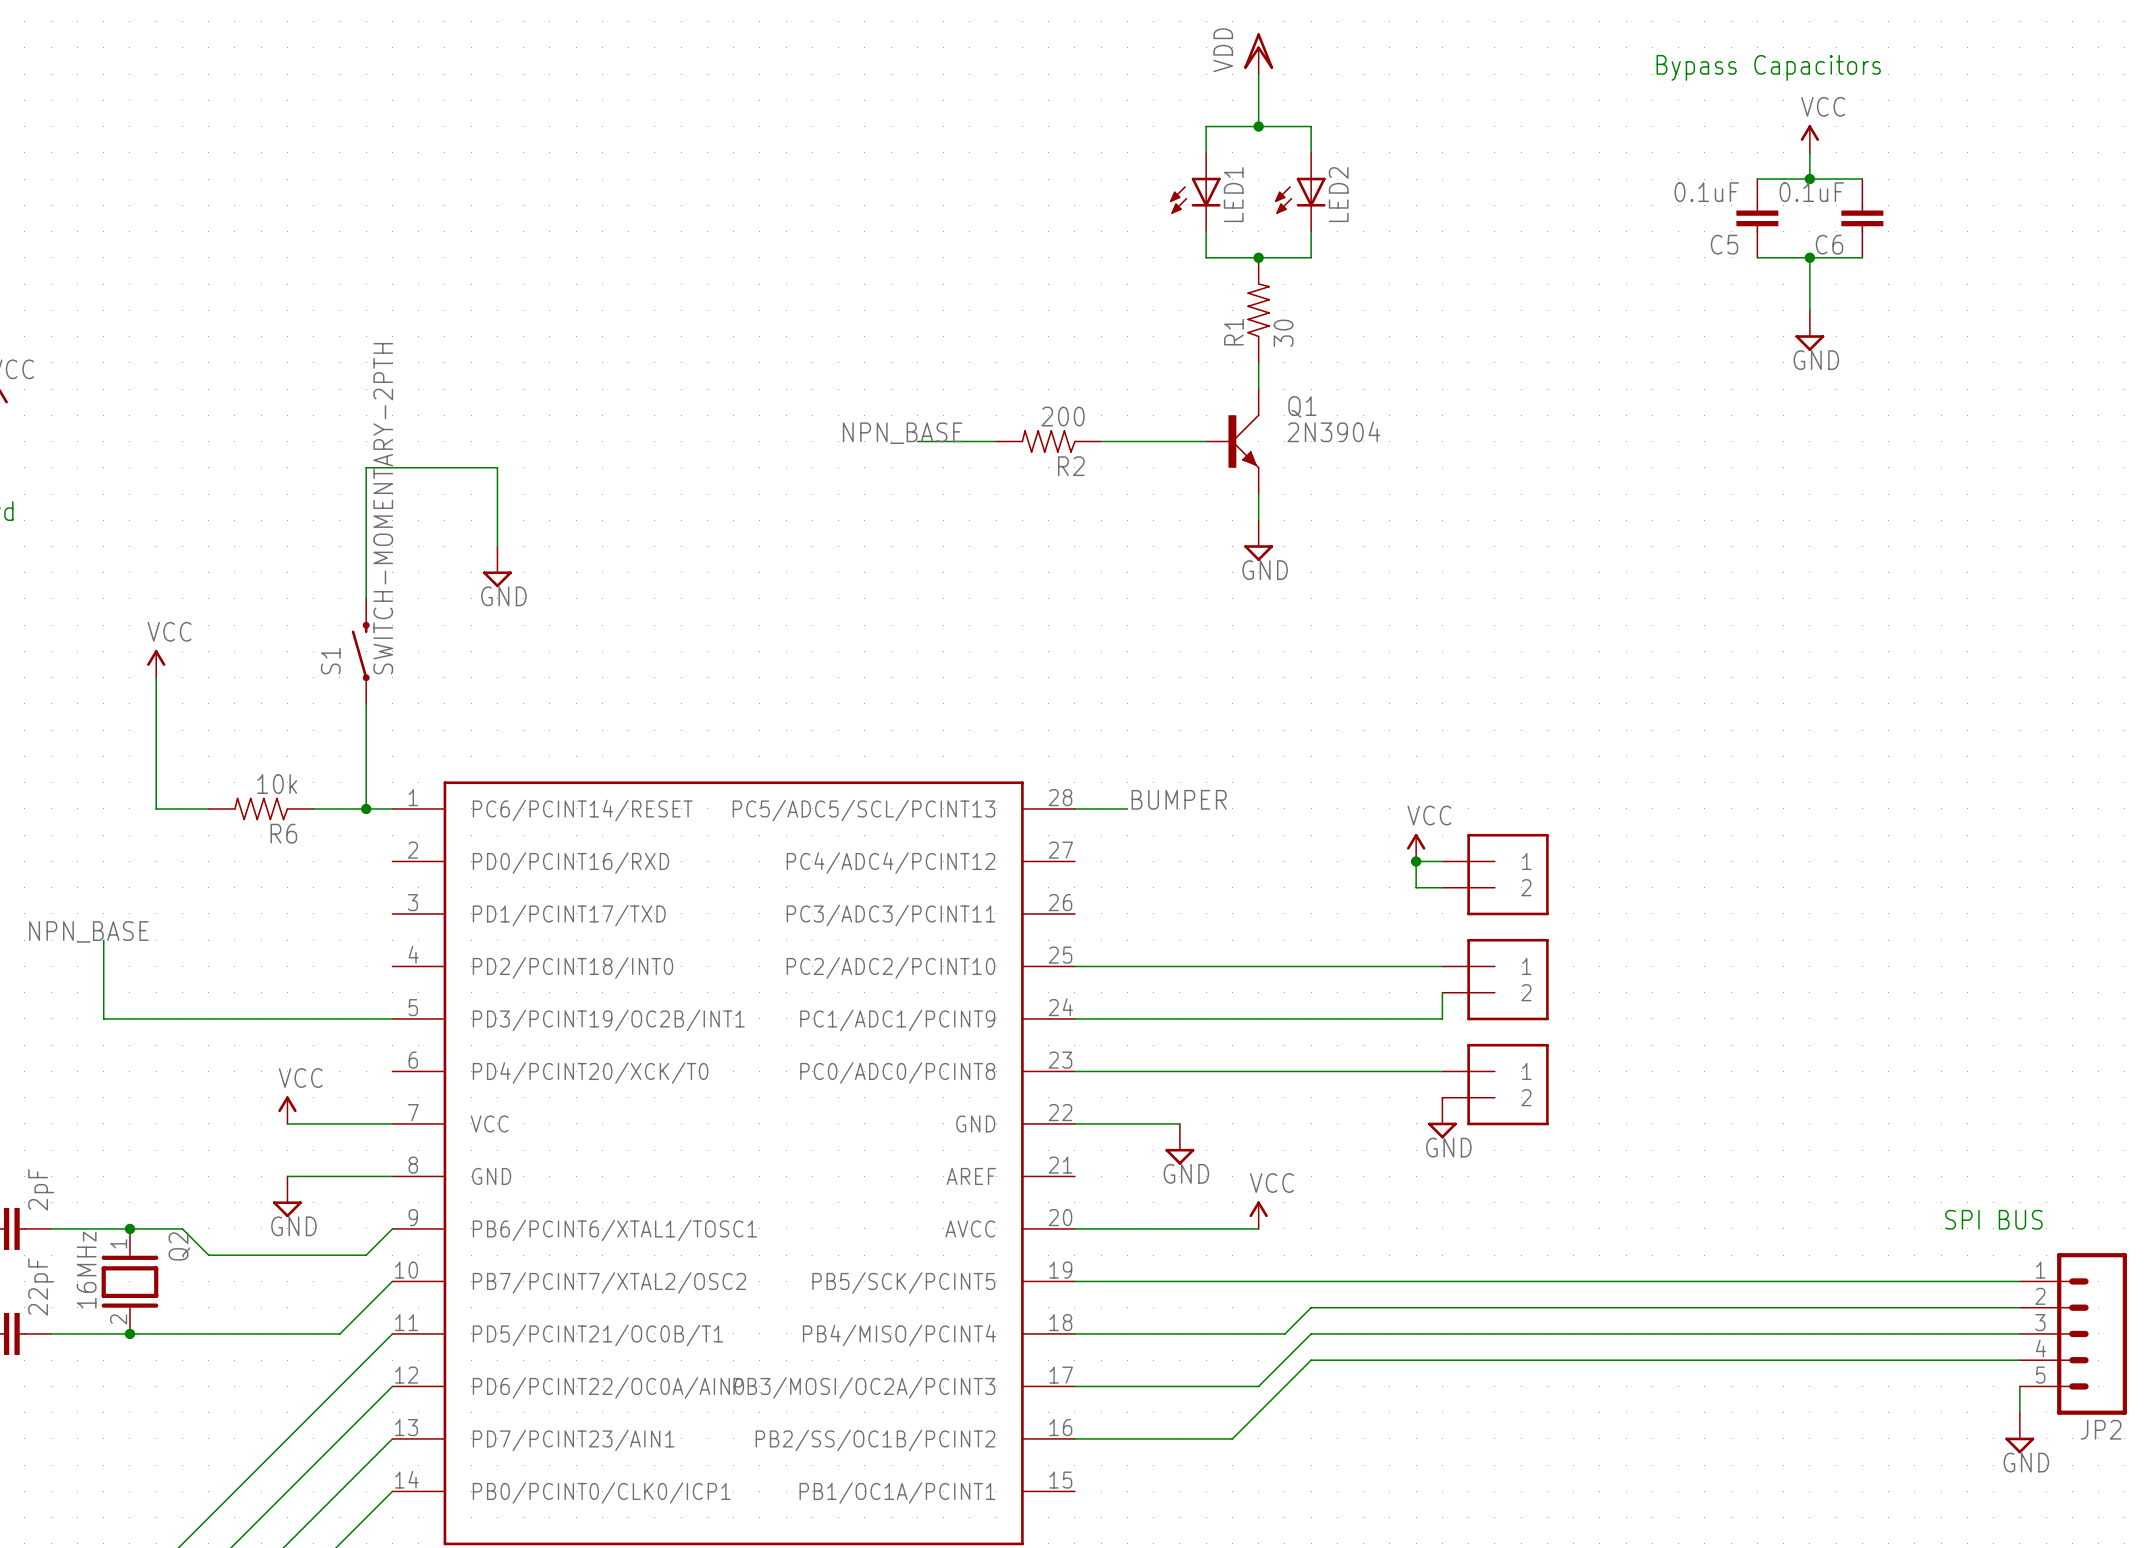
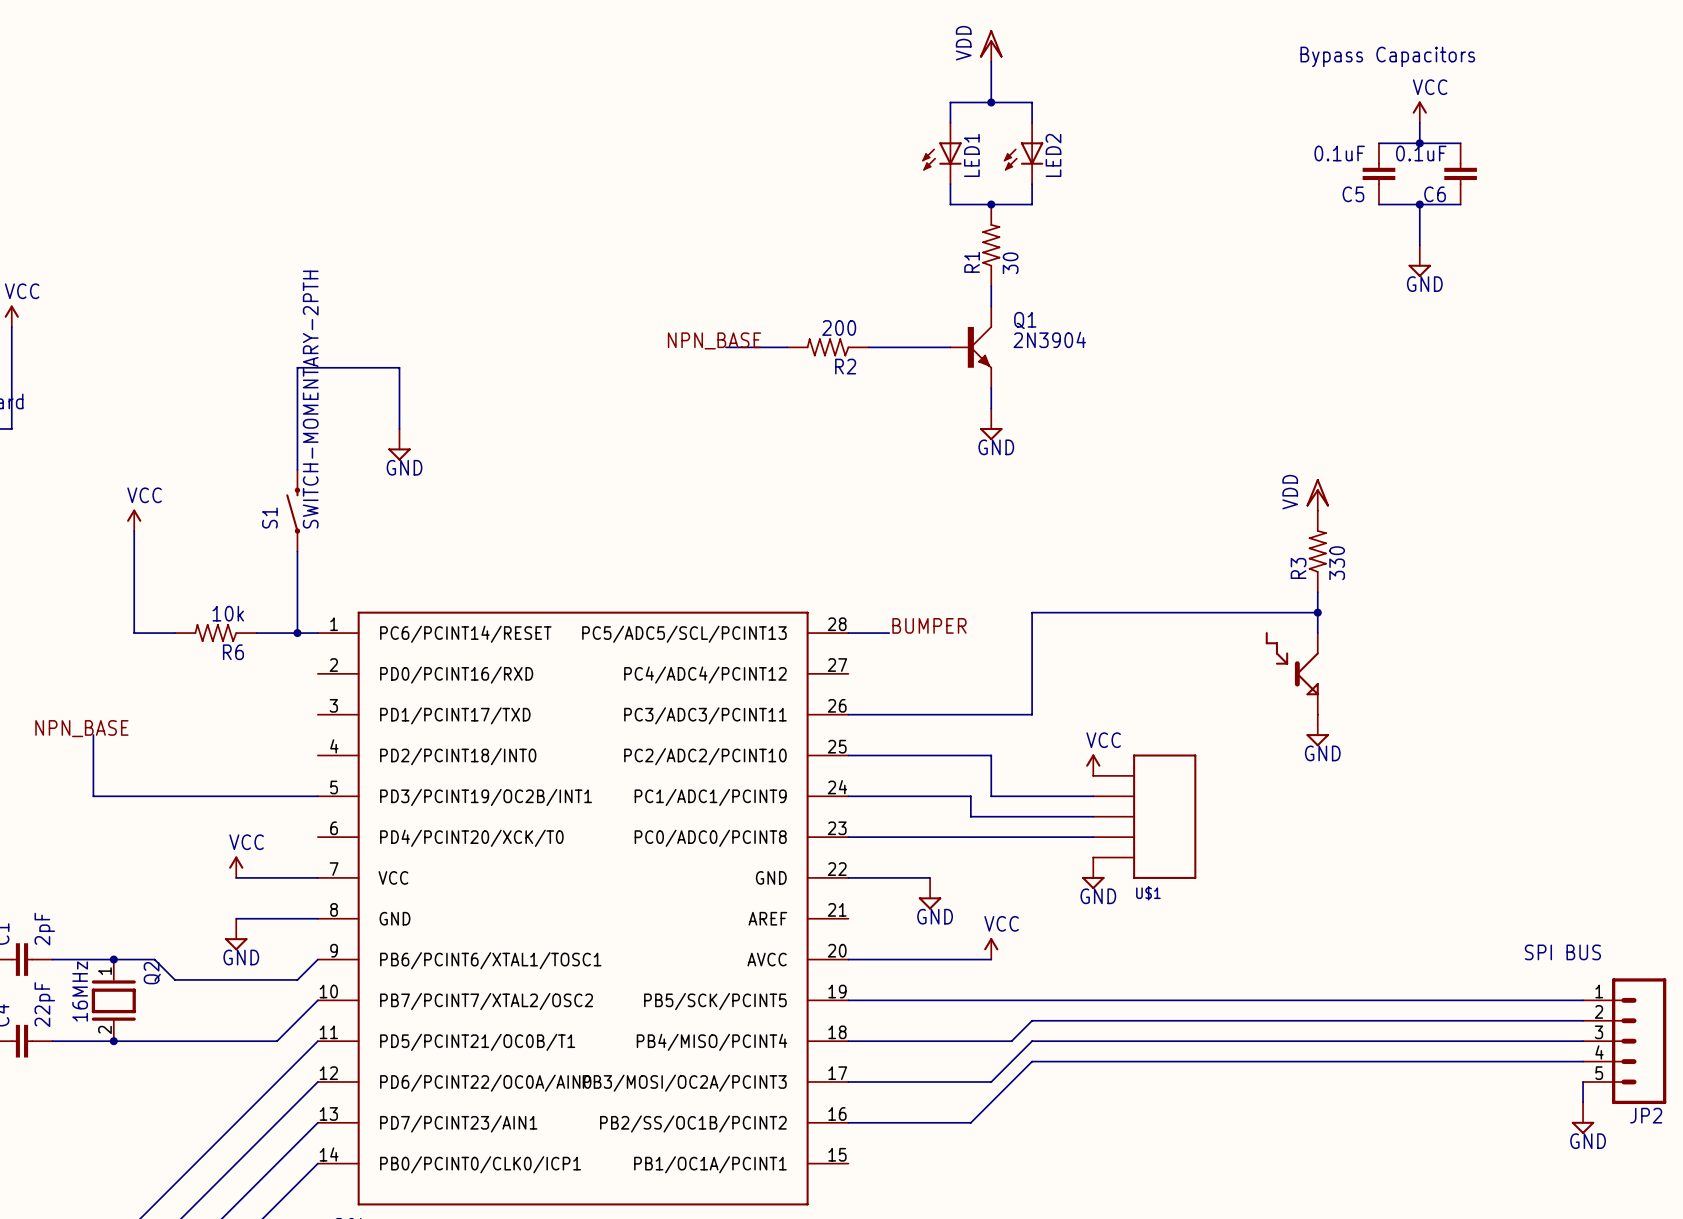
power symbol: none -> VDD (1317, 494)
R3: none -> 330 (1317, 551)
wire: none -> (1317, 592) (1317, 633)
wire: none -> (1317, 612) (1032, 612) (1032, 714) (848, 714)
junction: none -> (1317, 612)
power symbol position: VCC (1416, 847) -> VCC (1093, 765)
part: none -> (1292, 673)
junction: (1416, 861) -> none
wire: (1442, 861) (1416, 861) (1416, 887) (1442, 887) -> none
part: (1495, 874) -> none
power symbol: none -> GND (1317, 730)
wire: (1258, 966) (1442, 966) -> none
part: (1495, 979) -> none
wire: (1232, 1018) (1258, 1018) -> (991, 755) (991, 796)
wire: none -> (970, 796) (970, 816) (1093, 816)
U$1: none -> (1144, 816)
part: (1495, 1084) -> none
power symbol position: GND (1442, 1118) -> GND (1093, 873)

